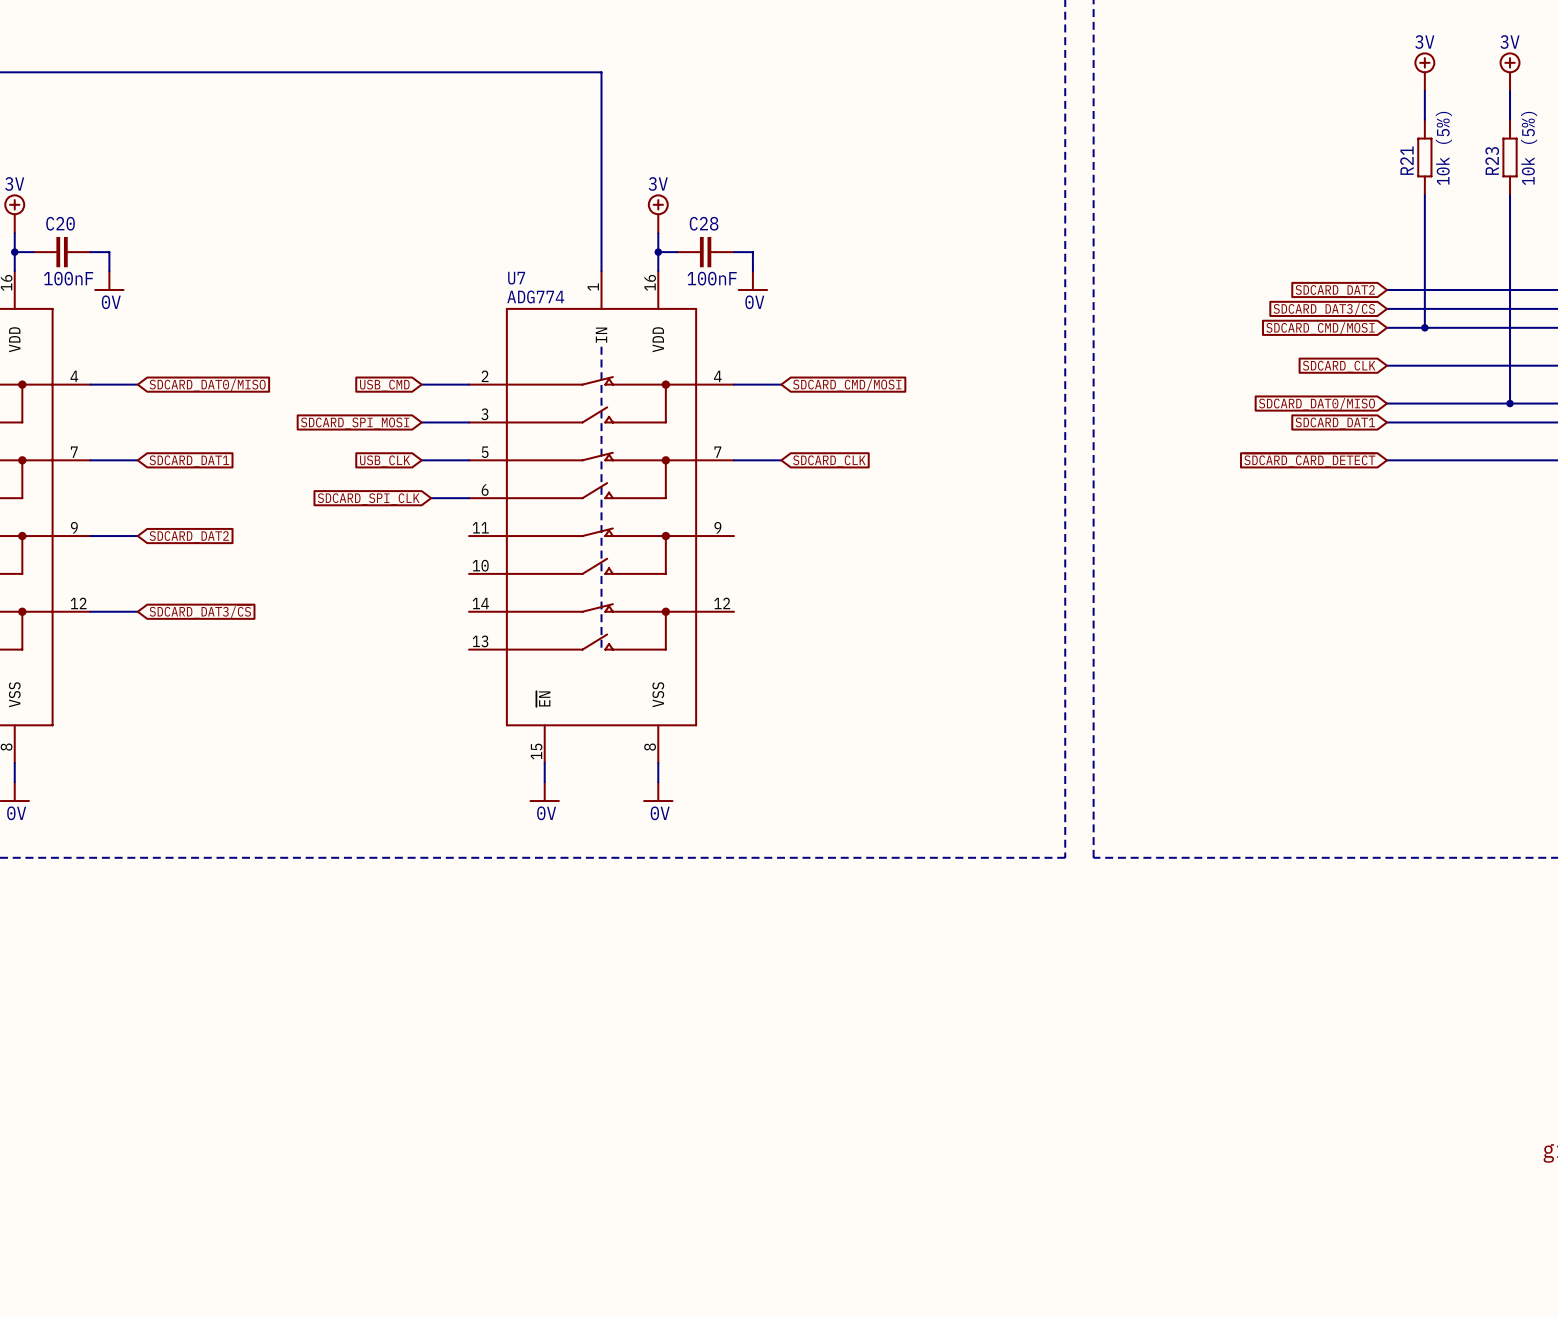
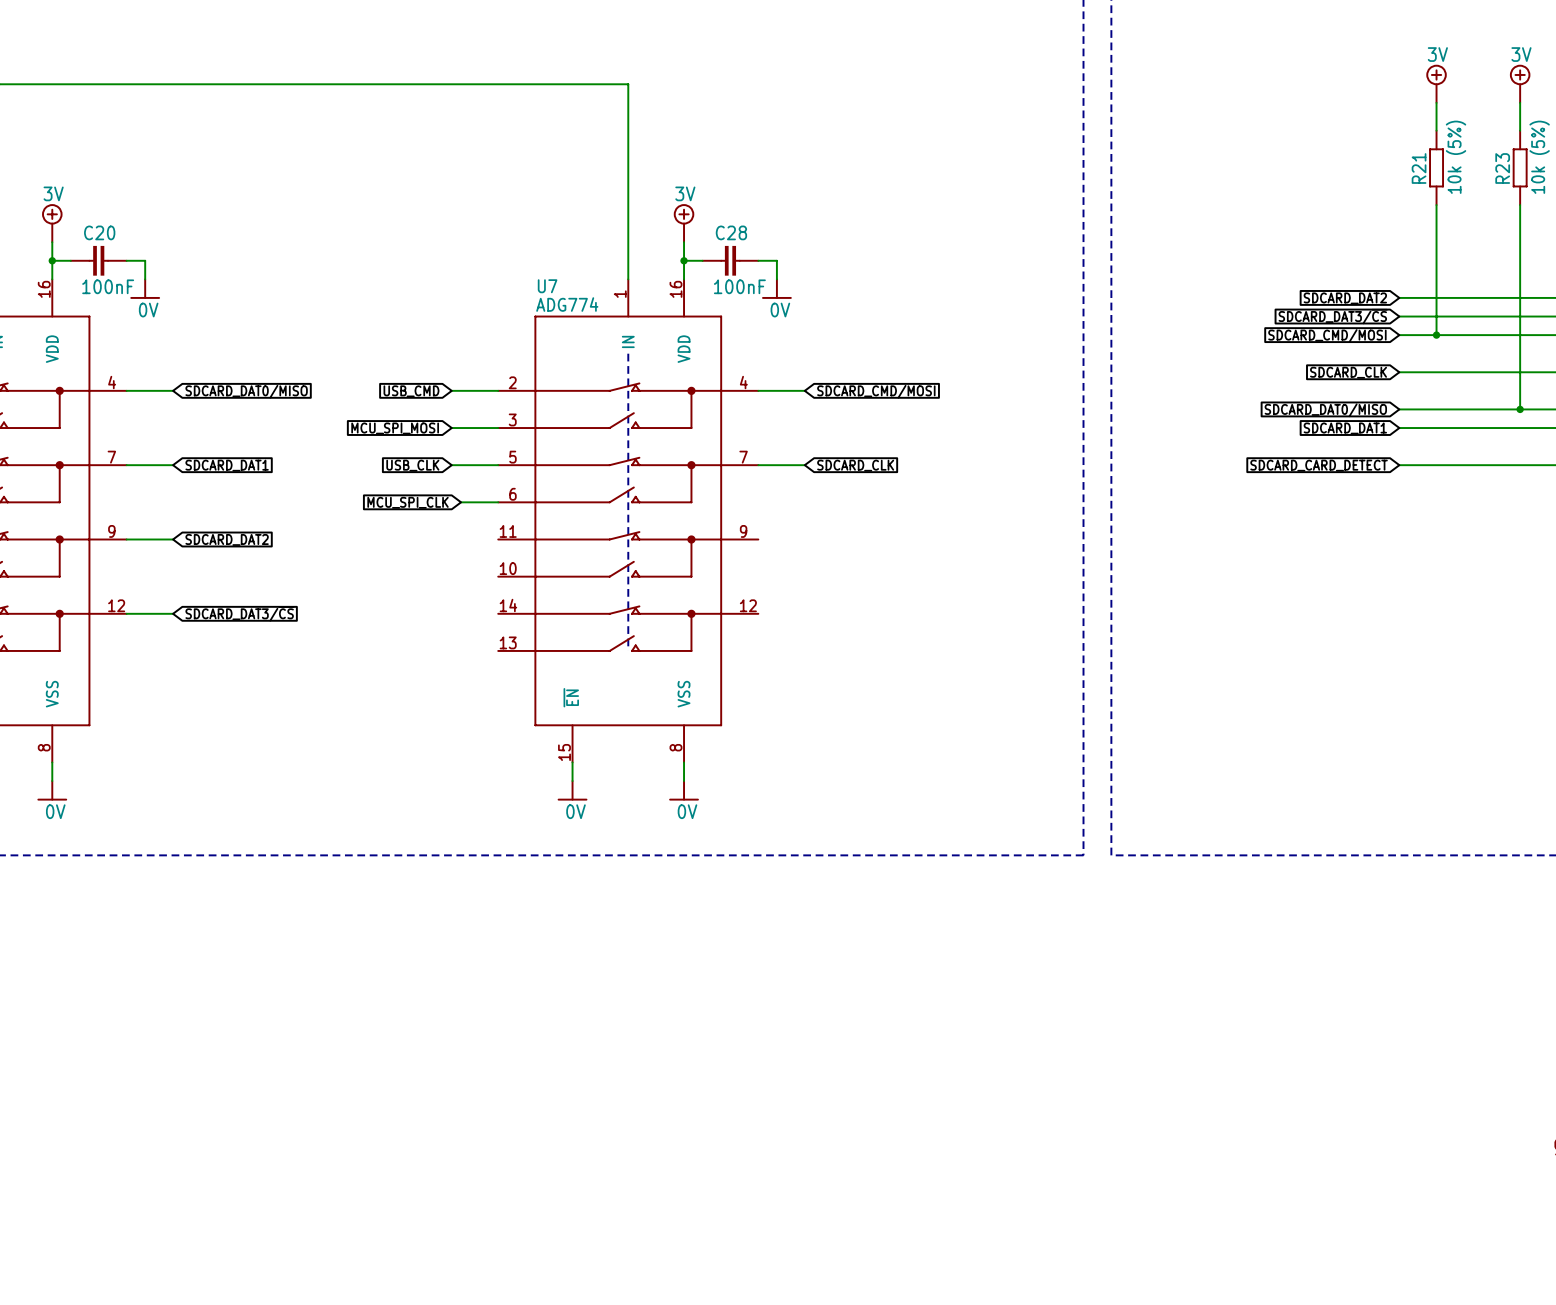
global label: SDCARD_SPI_MOSI (355, 423) -> MCU_SPI_MOSI (395, 428)
global label: ~{SDCARD_CARD_DETECT} (1309, 460) -> SDCARD_CARD_DETECT (1319, 465)
global label: SDCARD_SPI_CLK (368, 499) -> MCU_SPI_CLK (408, 502)

